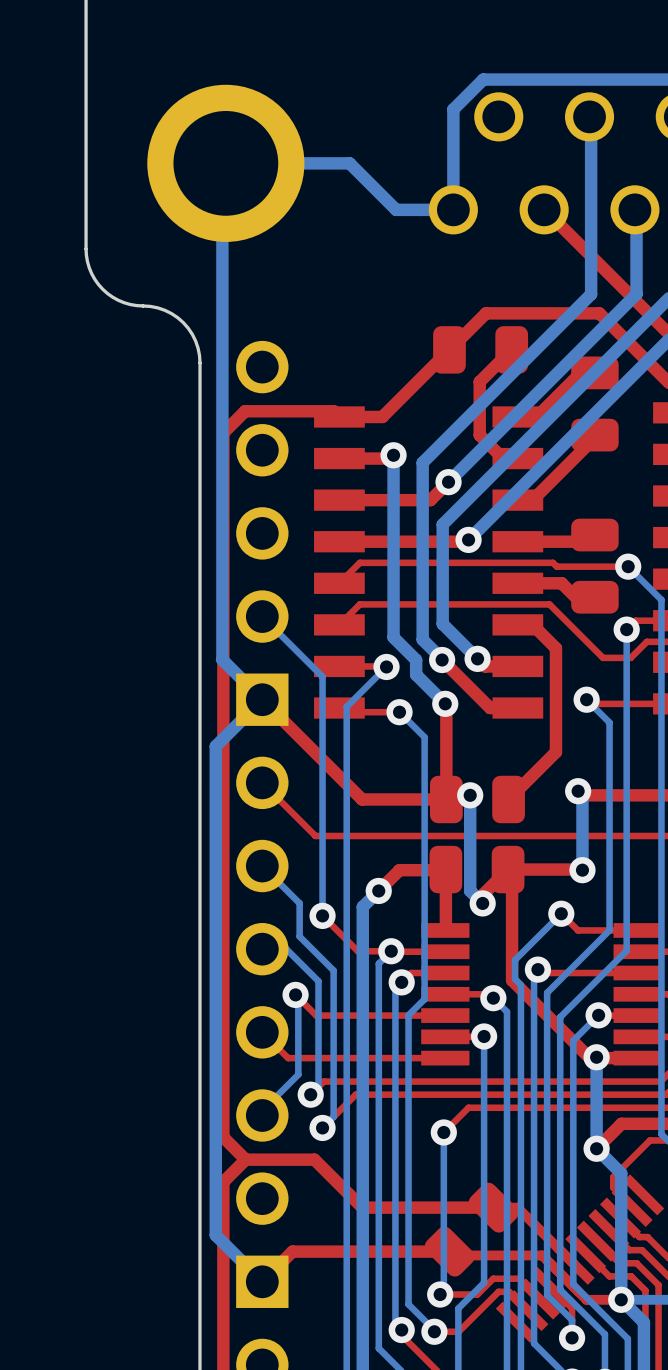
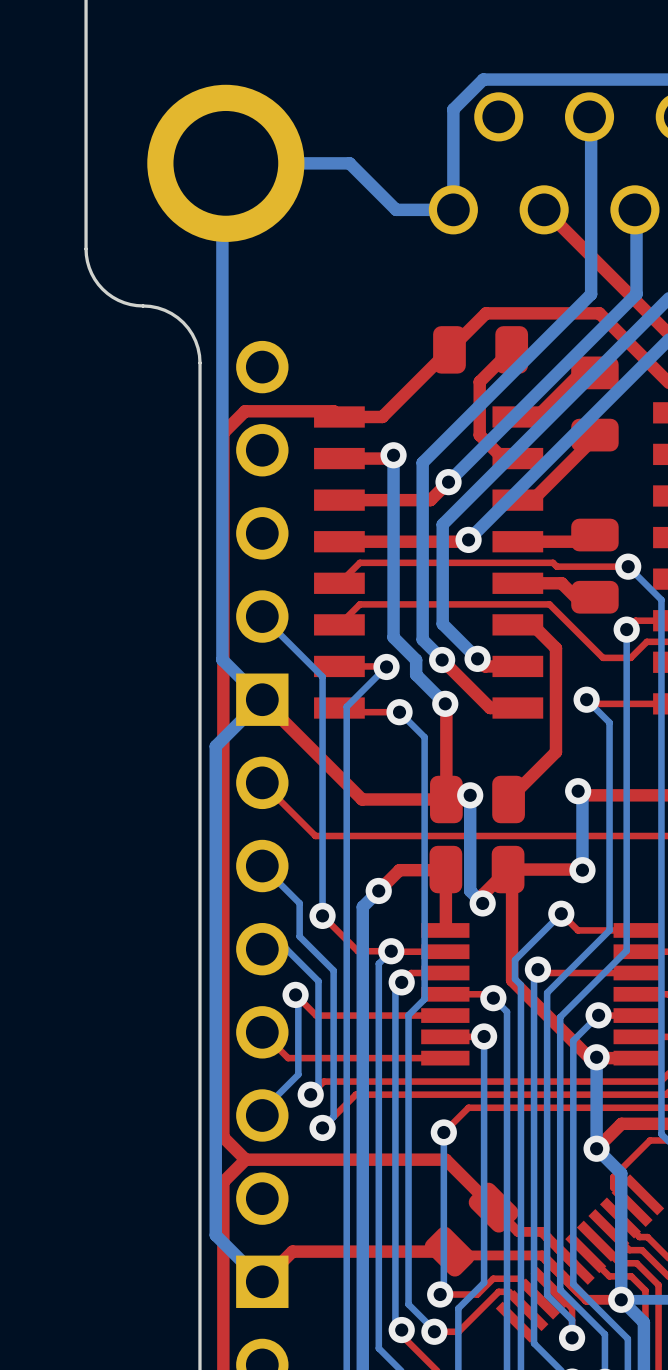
top track: (314, 1159) (362, 1207) (517, 1207) (541, 1231) -> (314, 1159) (445, 1159) (517, 1231) (541, 1231)

